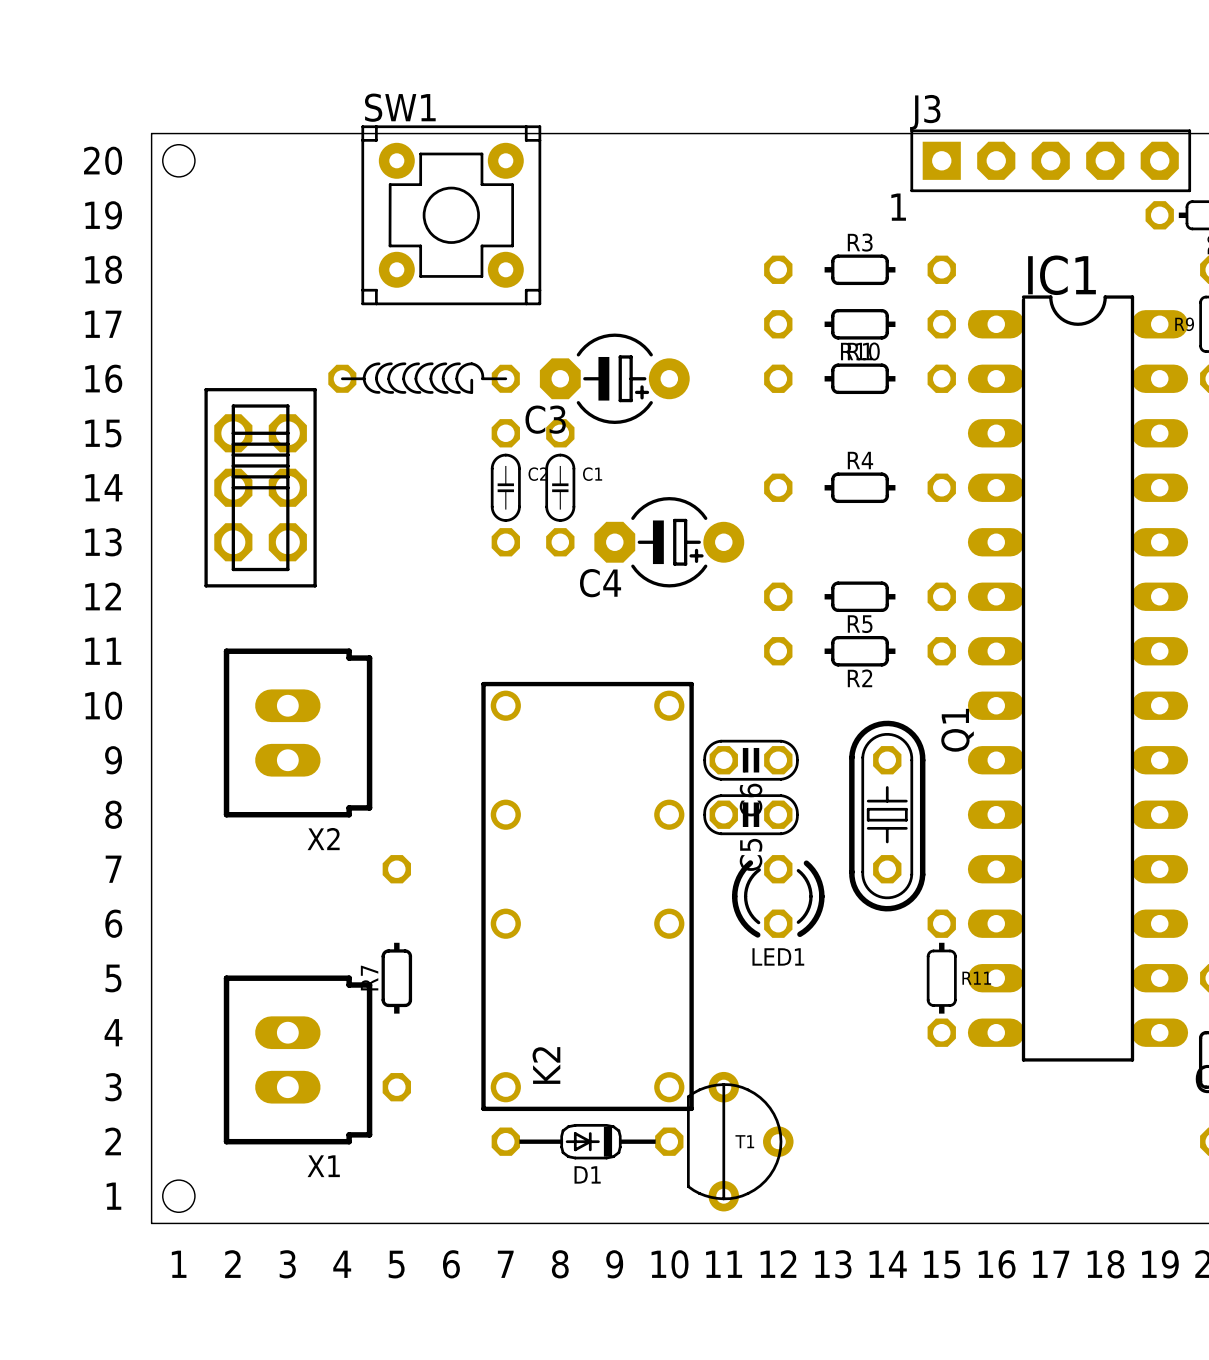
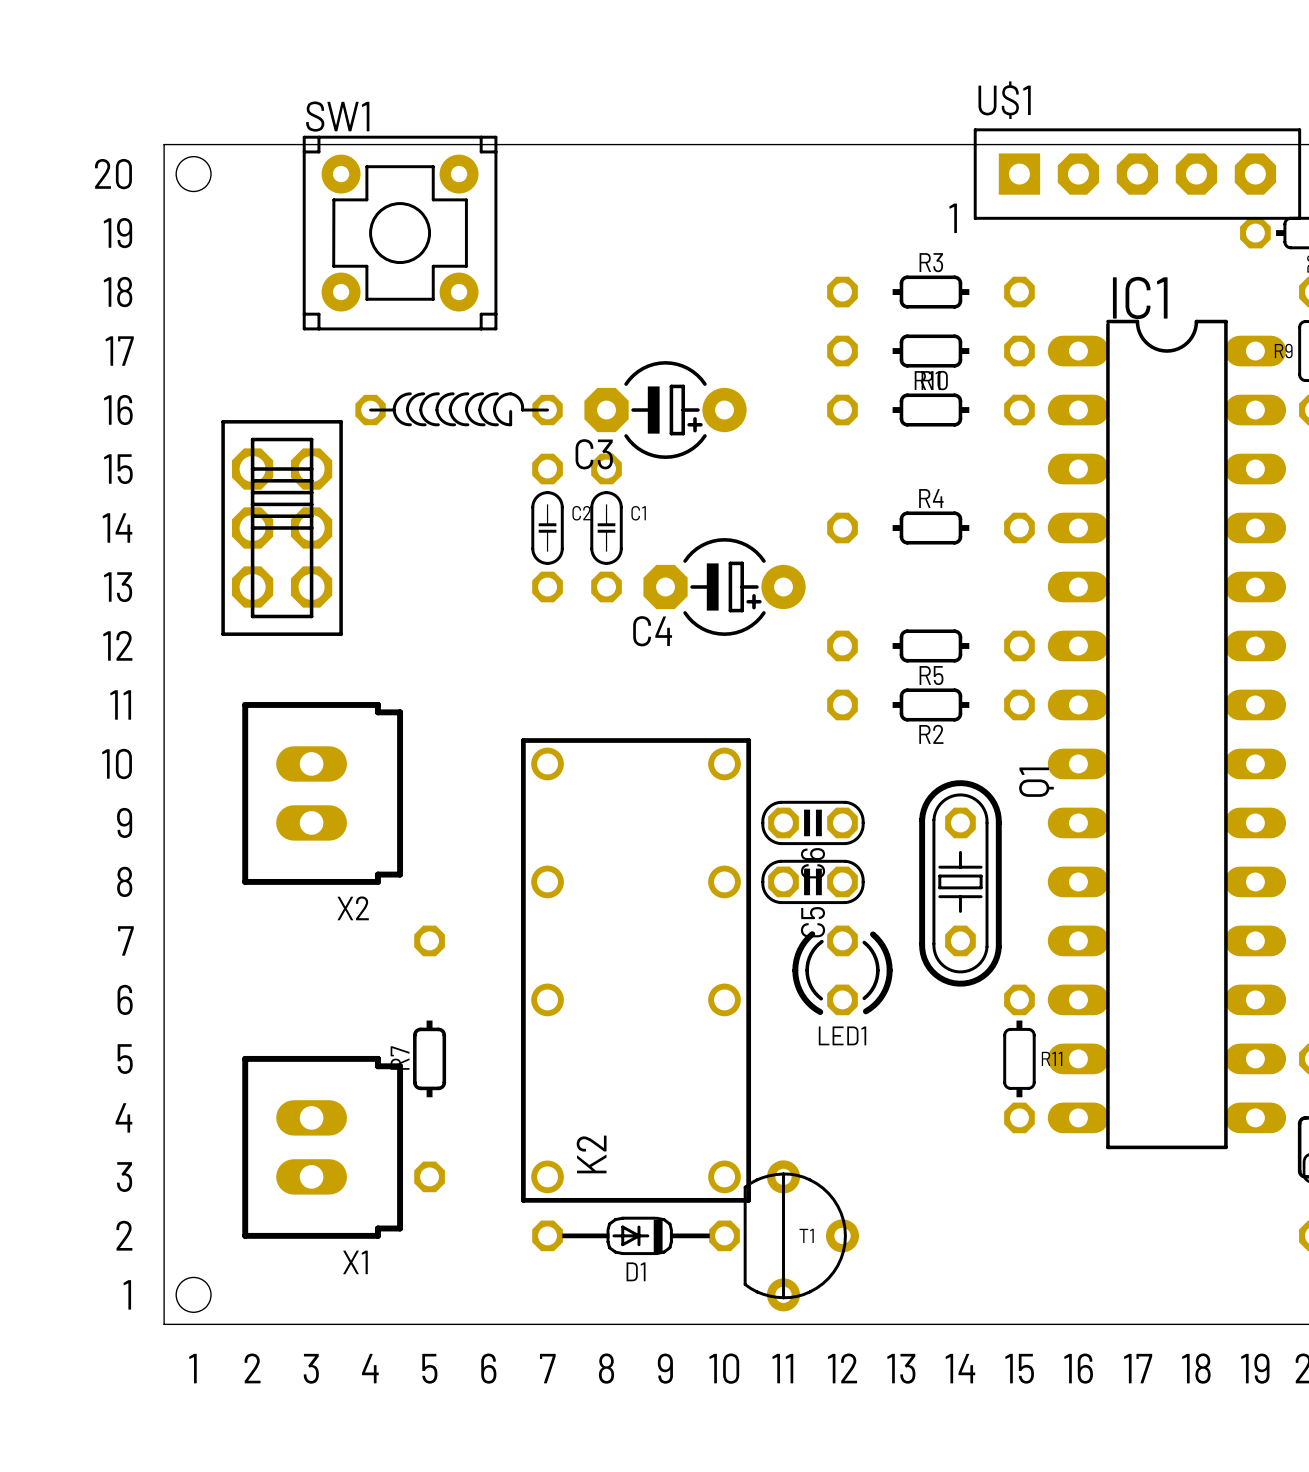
J3: (1050, 160) -> none
U$1: none -> (1137, 174)
SW1 position: (451, 215) -> (400, 233)

